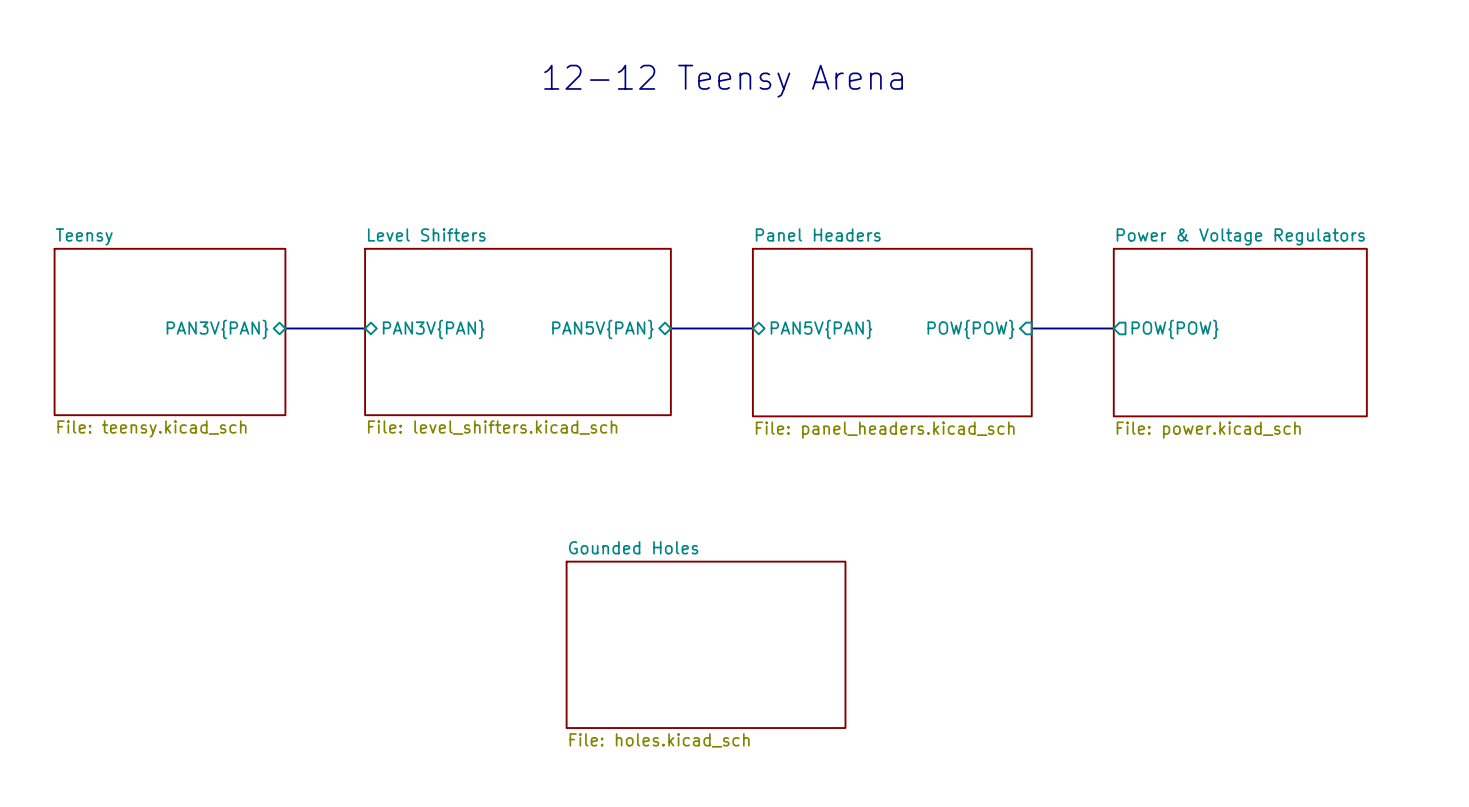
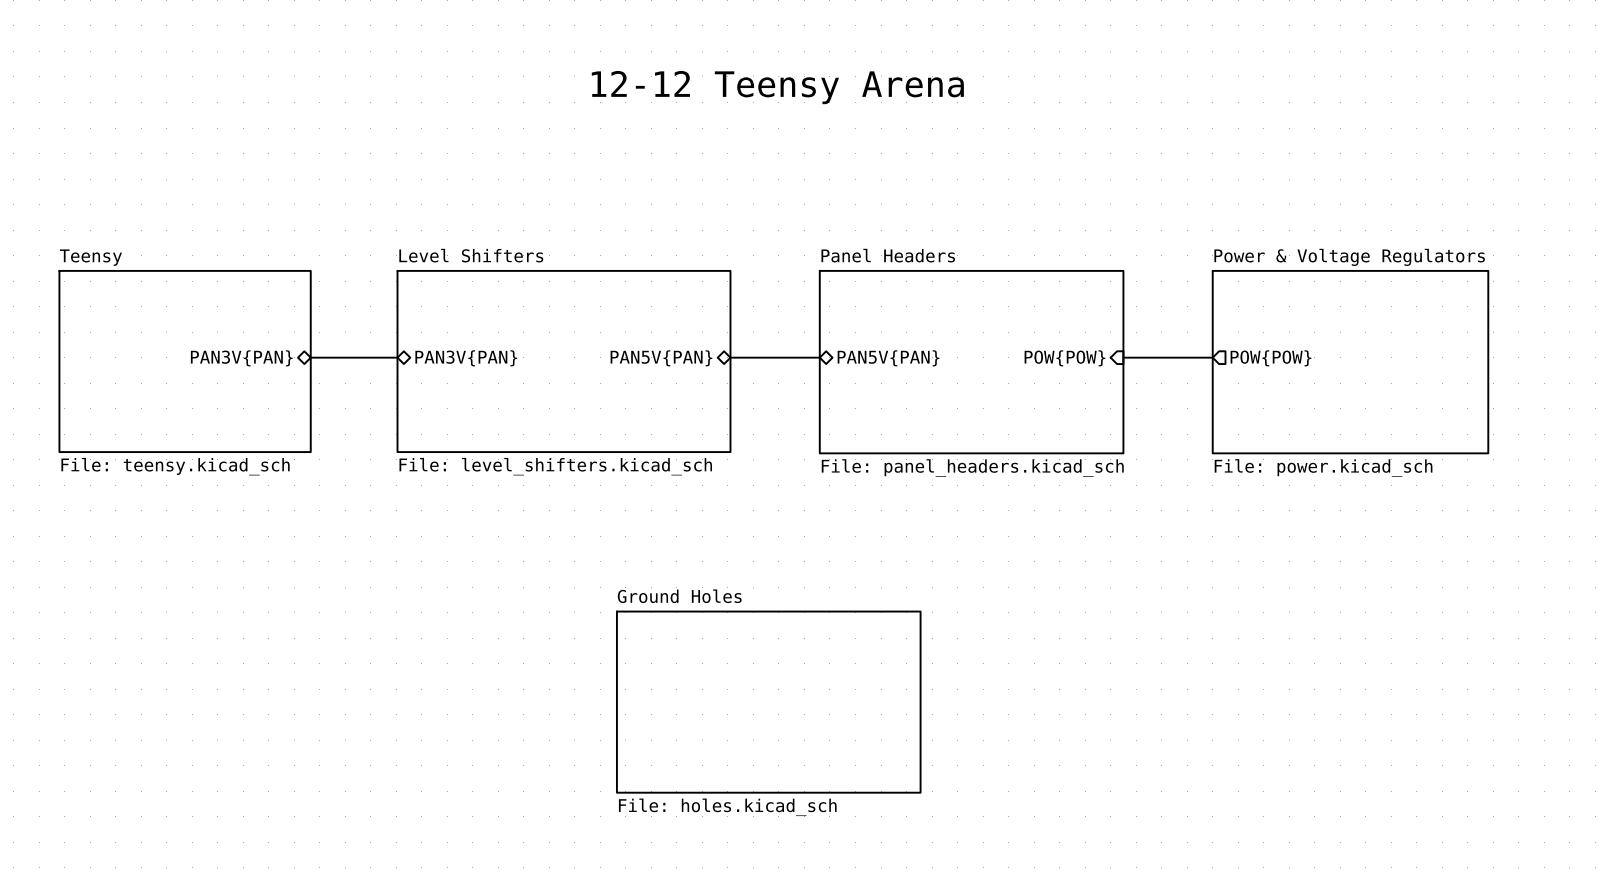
sheet Gounded Holes name: Gounded Holes (633, 547) -> Ground Holes (679, 596)

